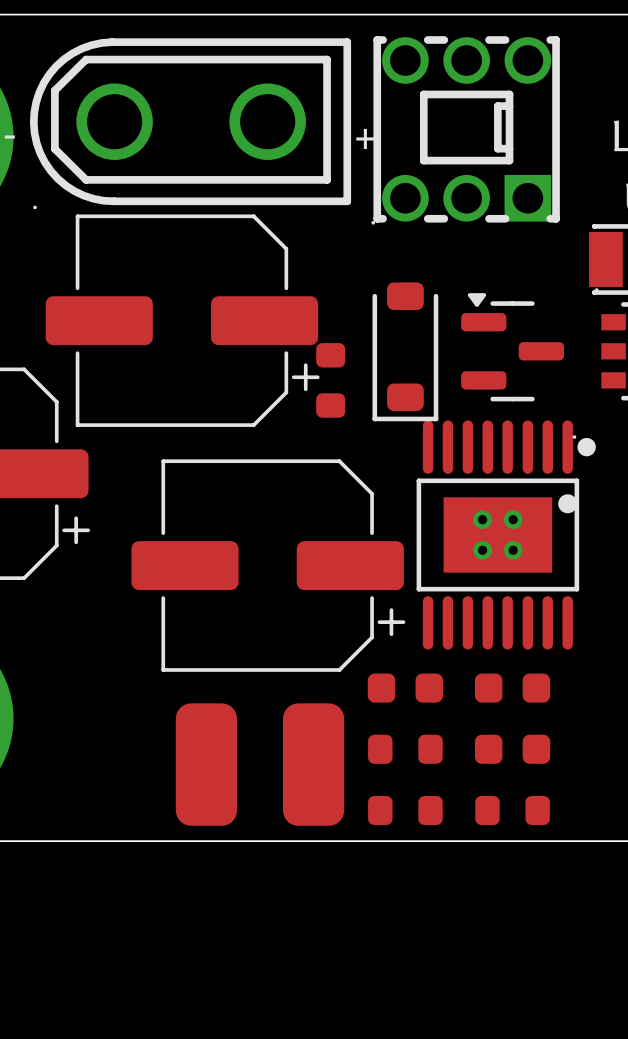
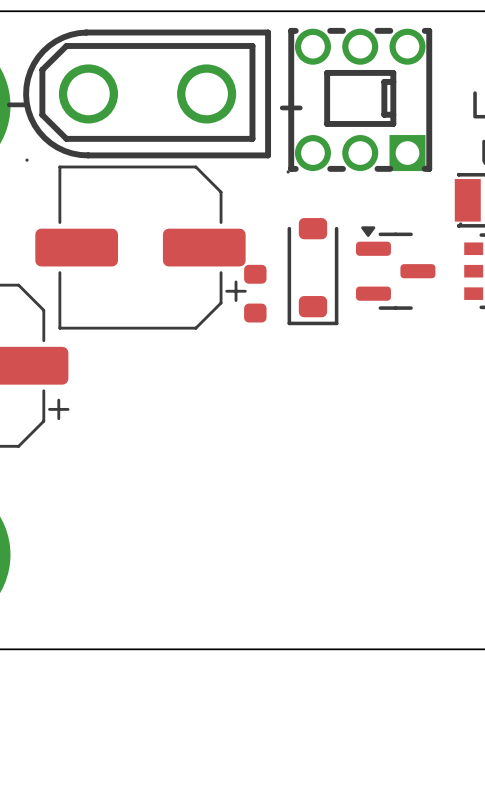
part: (506, 534) -> none
part: (268, 565) -> none
part: (405, 688) -> none
part: (512, 688) -> none
part: (405, 749) -> none
part: (512, 749) -> none
part: (206, 764) -> none
part: (313, 764) -> none
part: (405, 810) -> none
part: (512, 810) -> none

